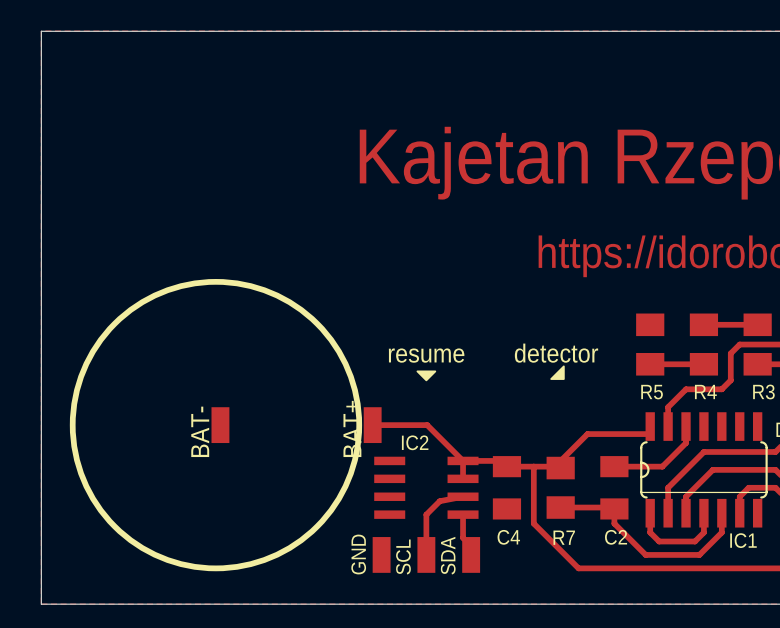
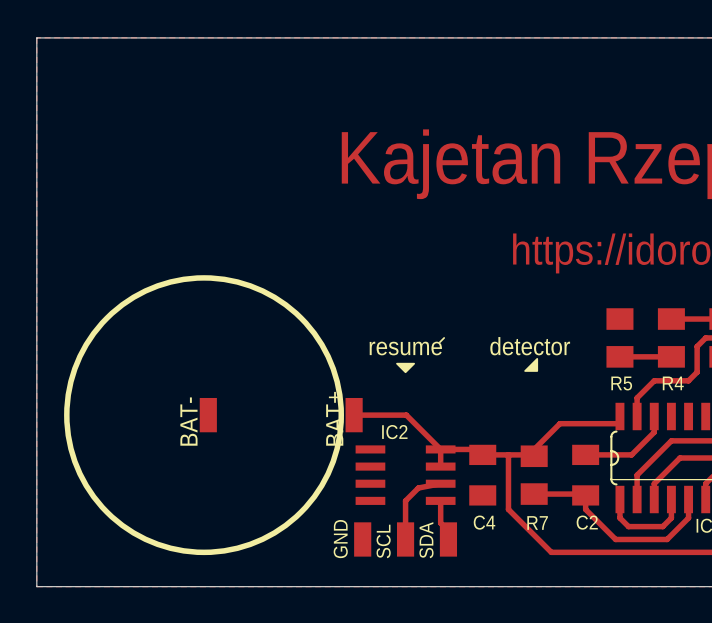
line: none -> (444, 337) (439, 342)

